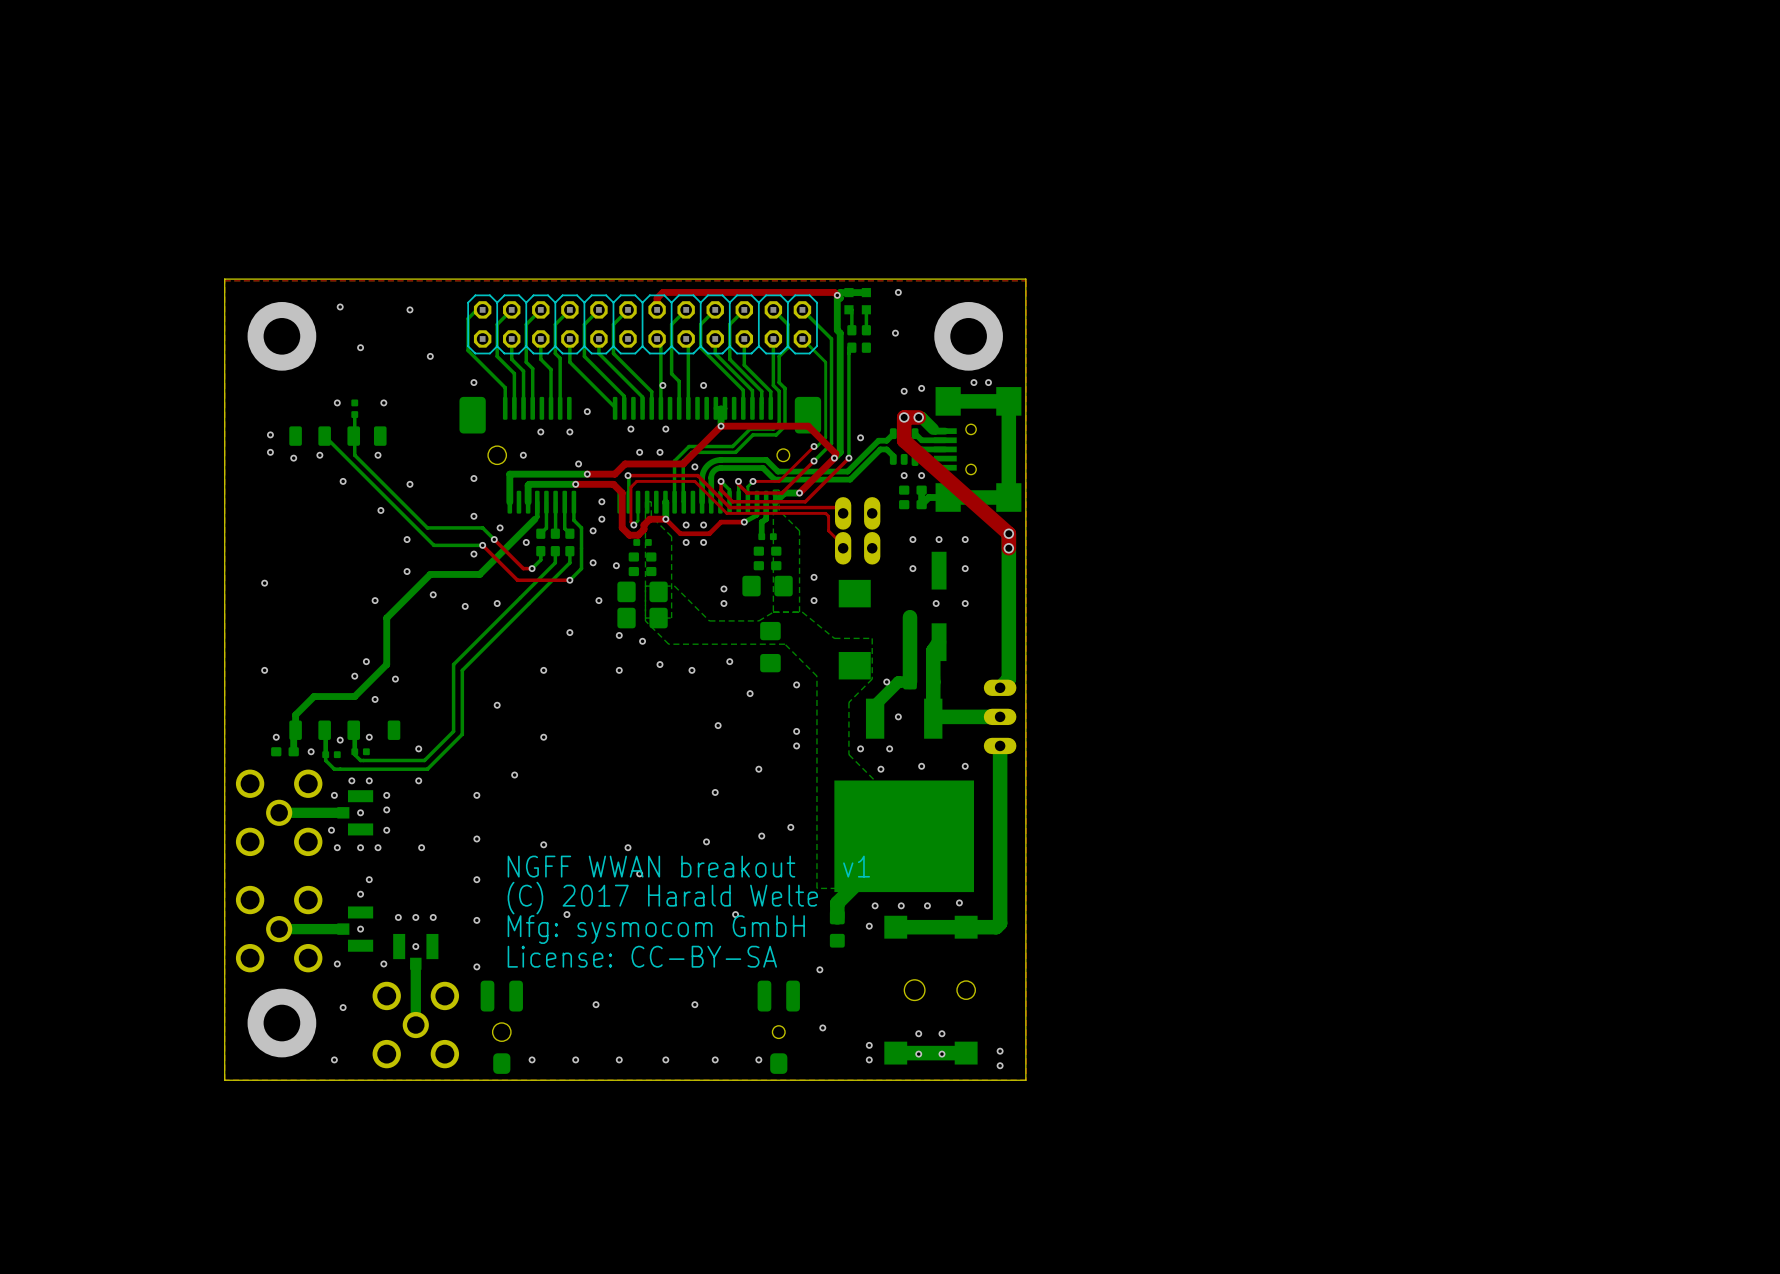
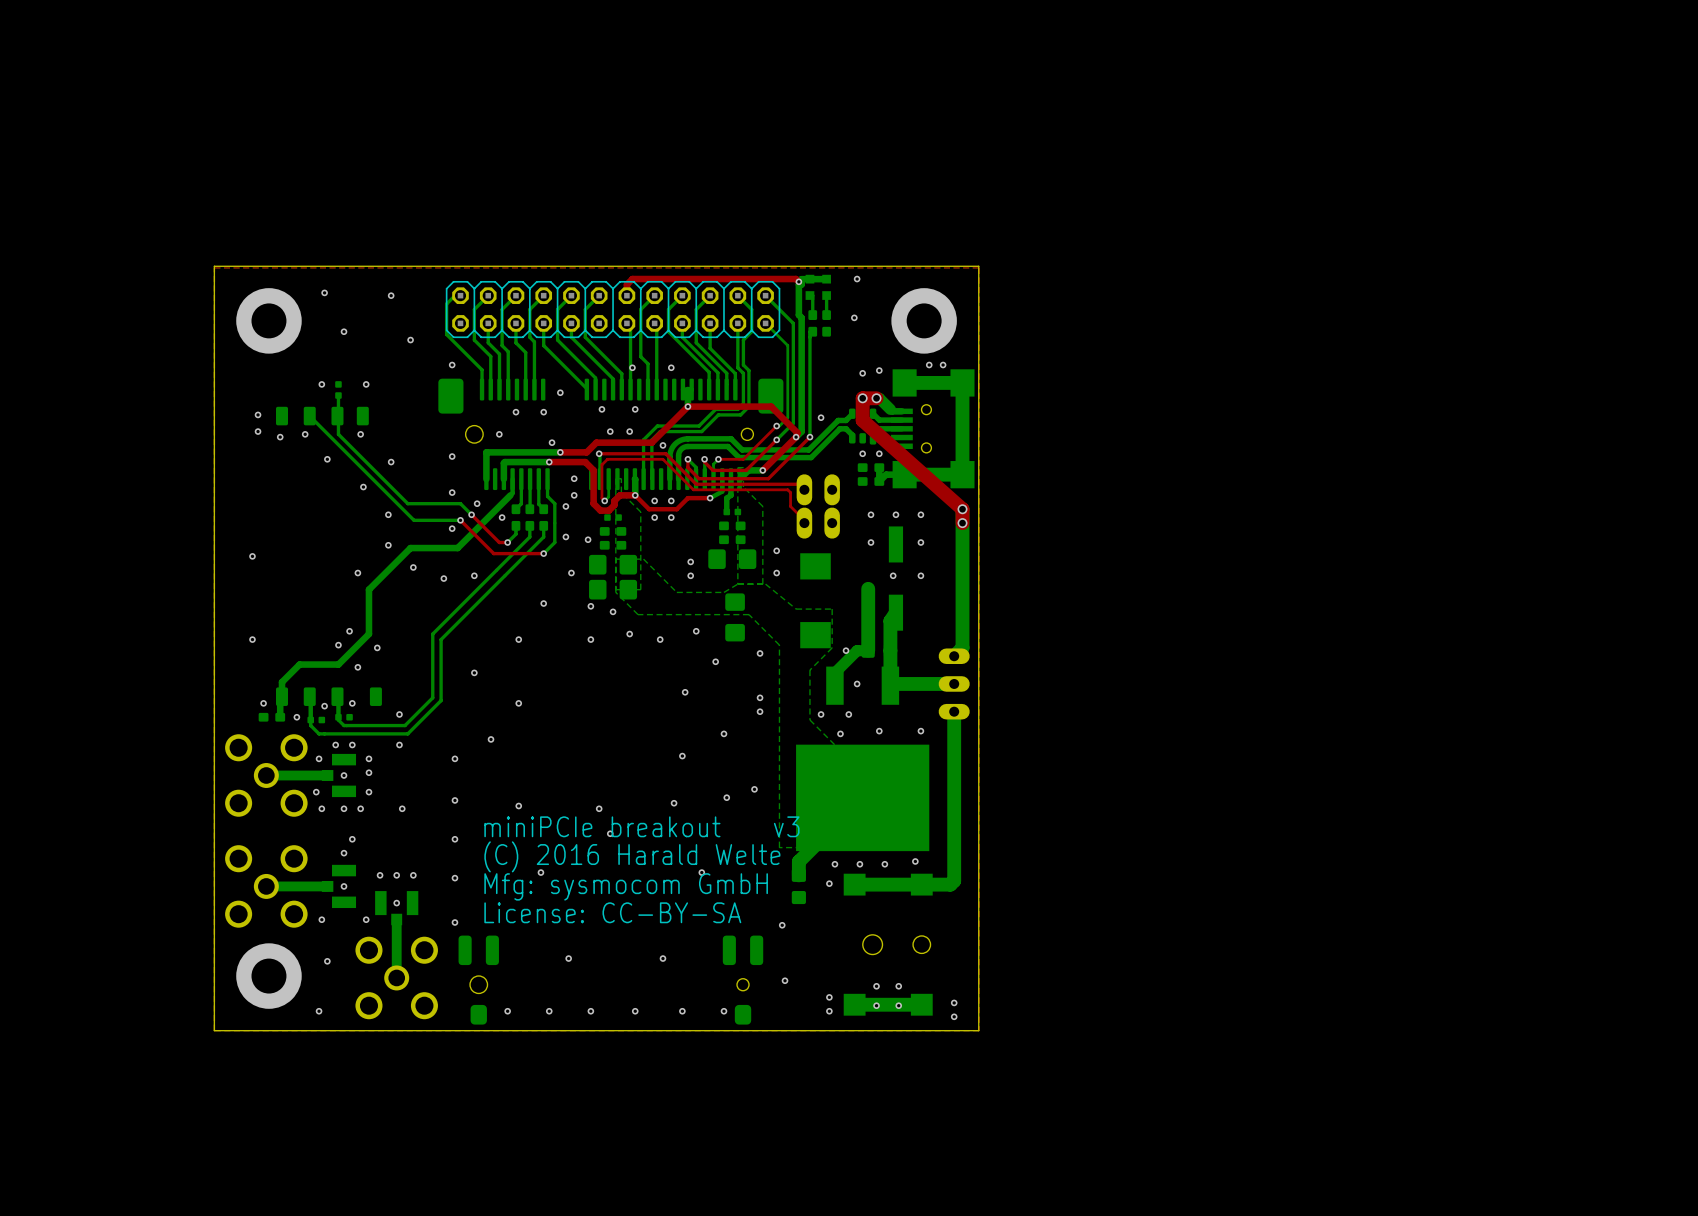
text: NGFF WWAN breakout (651, 866) -> miniPCIe breakout (602, 826)
text: none -> v3 (786, 826)
text: v1 (856, 866) -> none
text: (C) 2017 Harald Welte (662, 898) -> (C) 2016 Harald Welte (632, 856)

